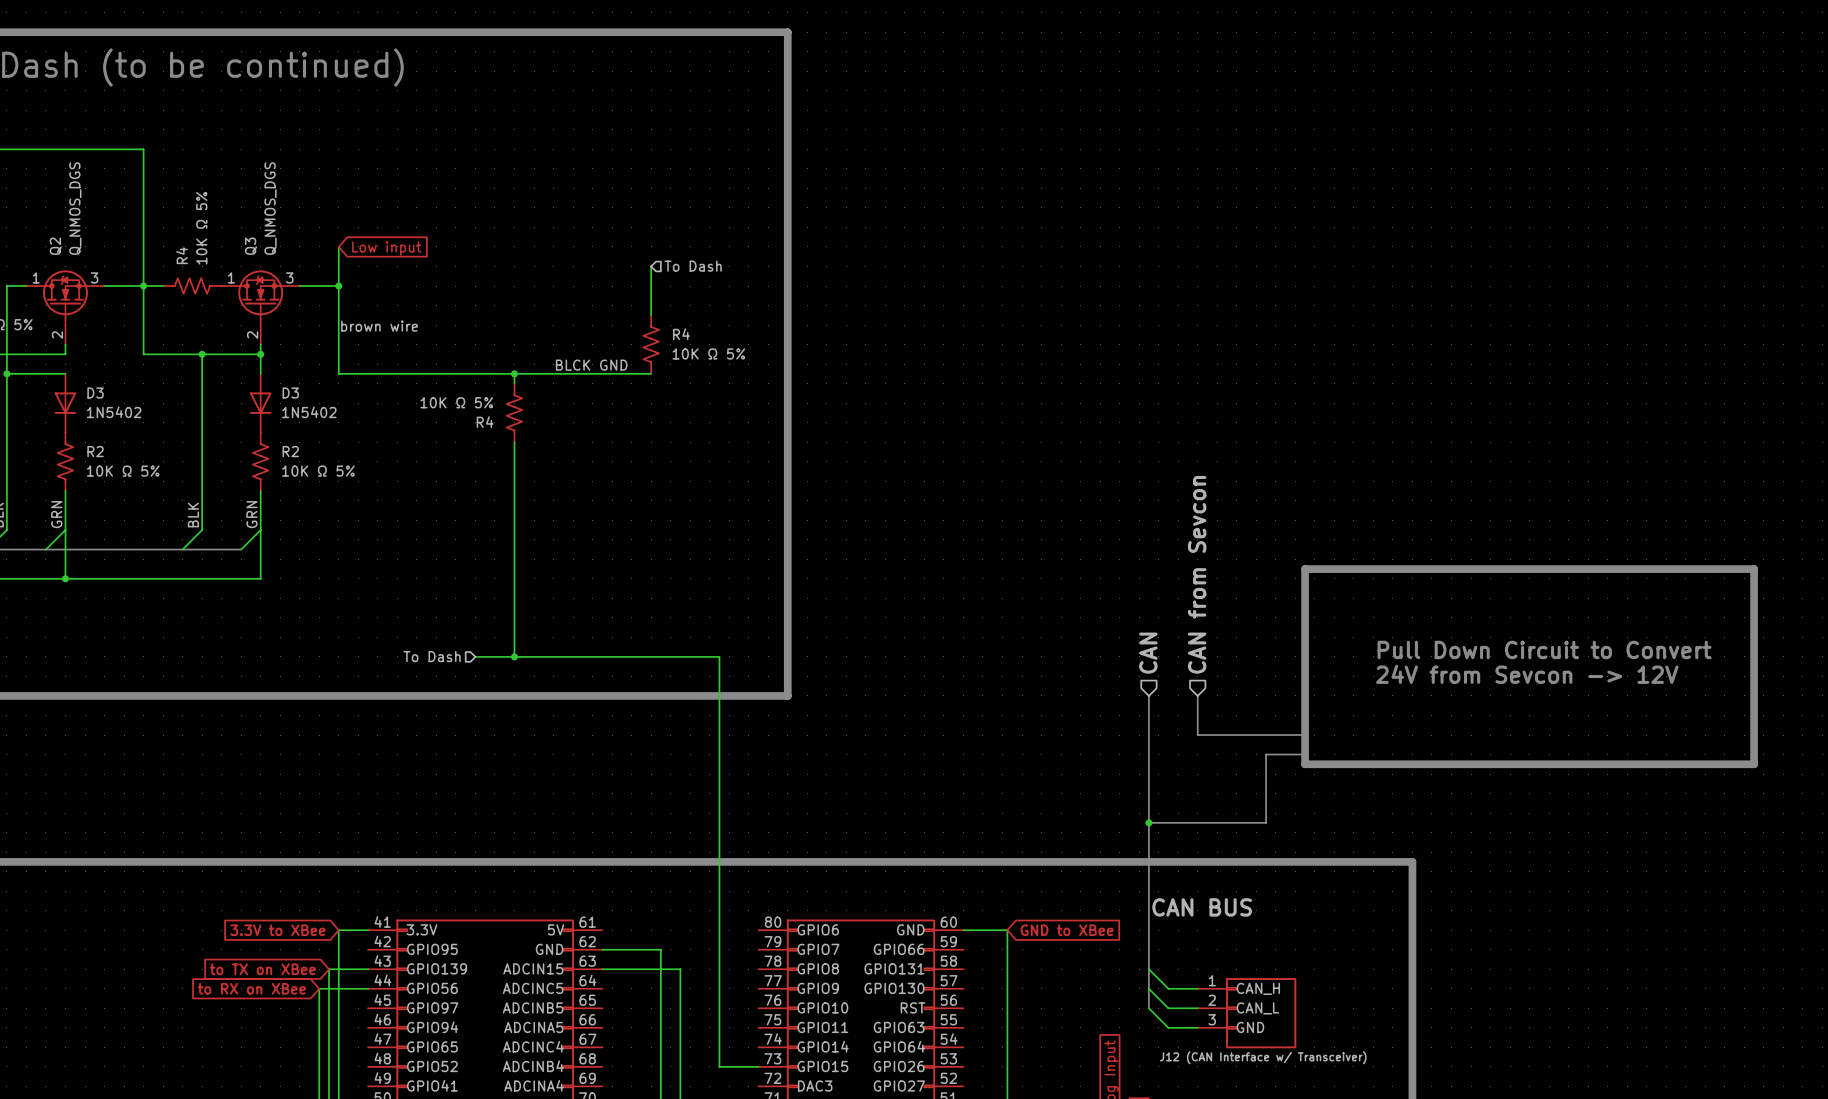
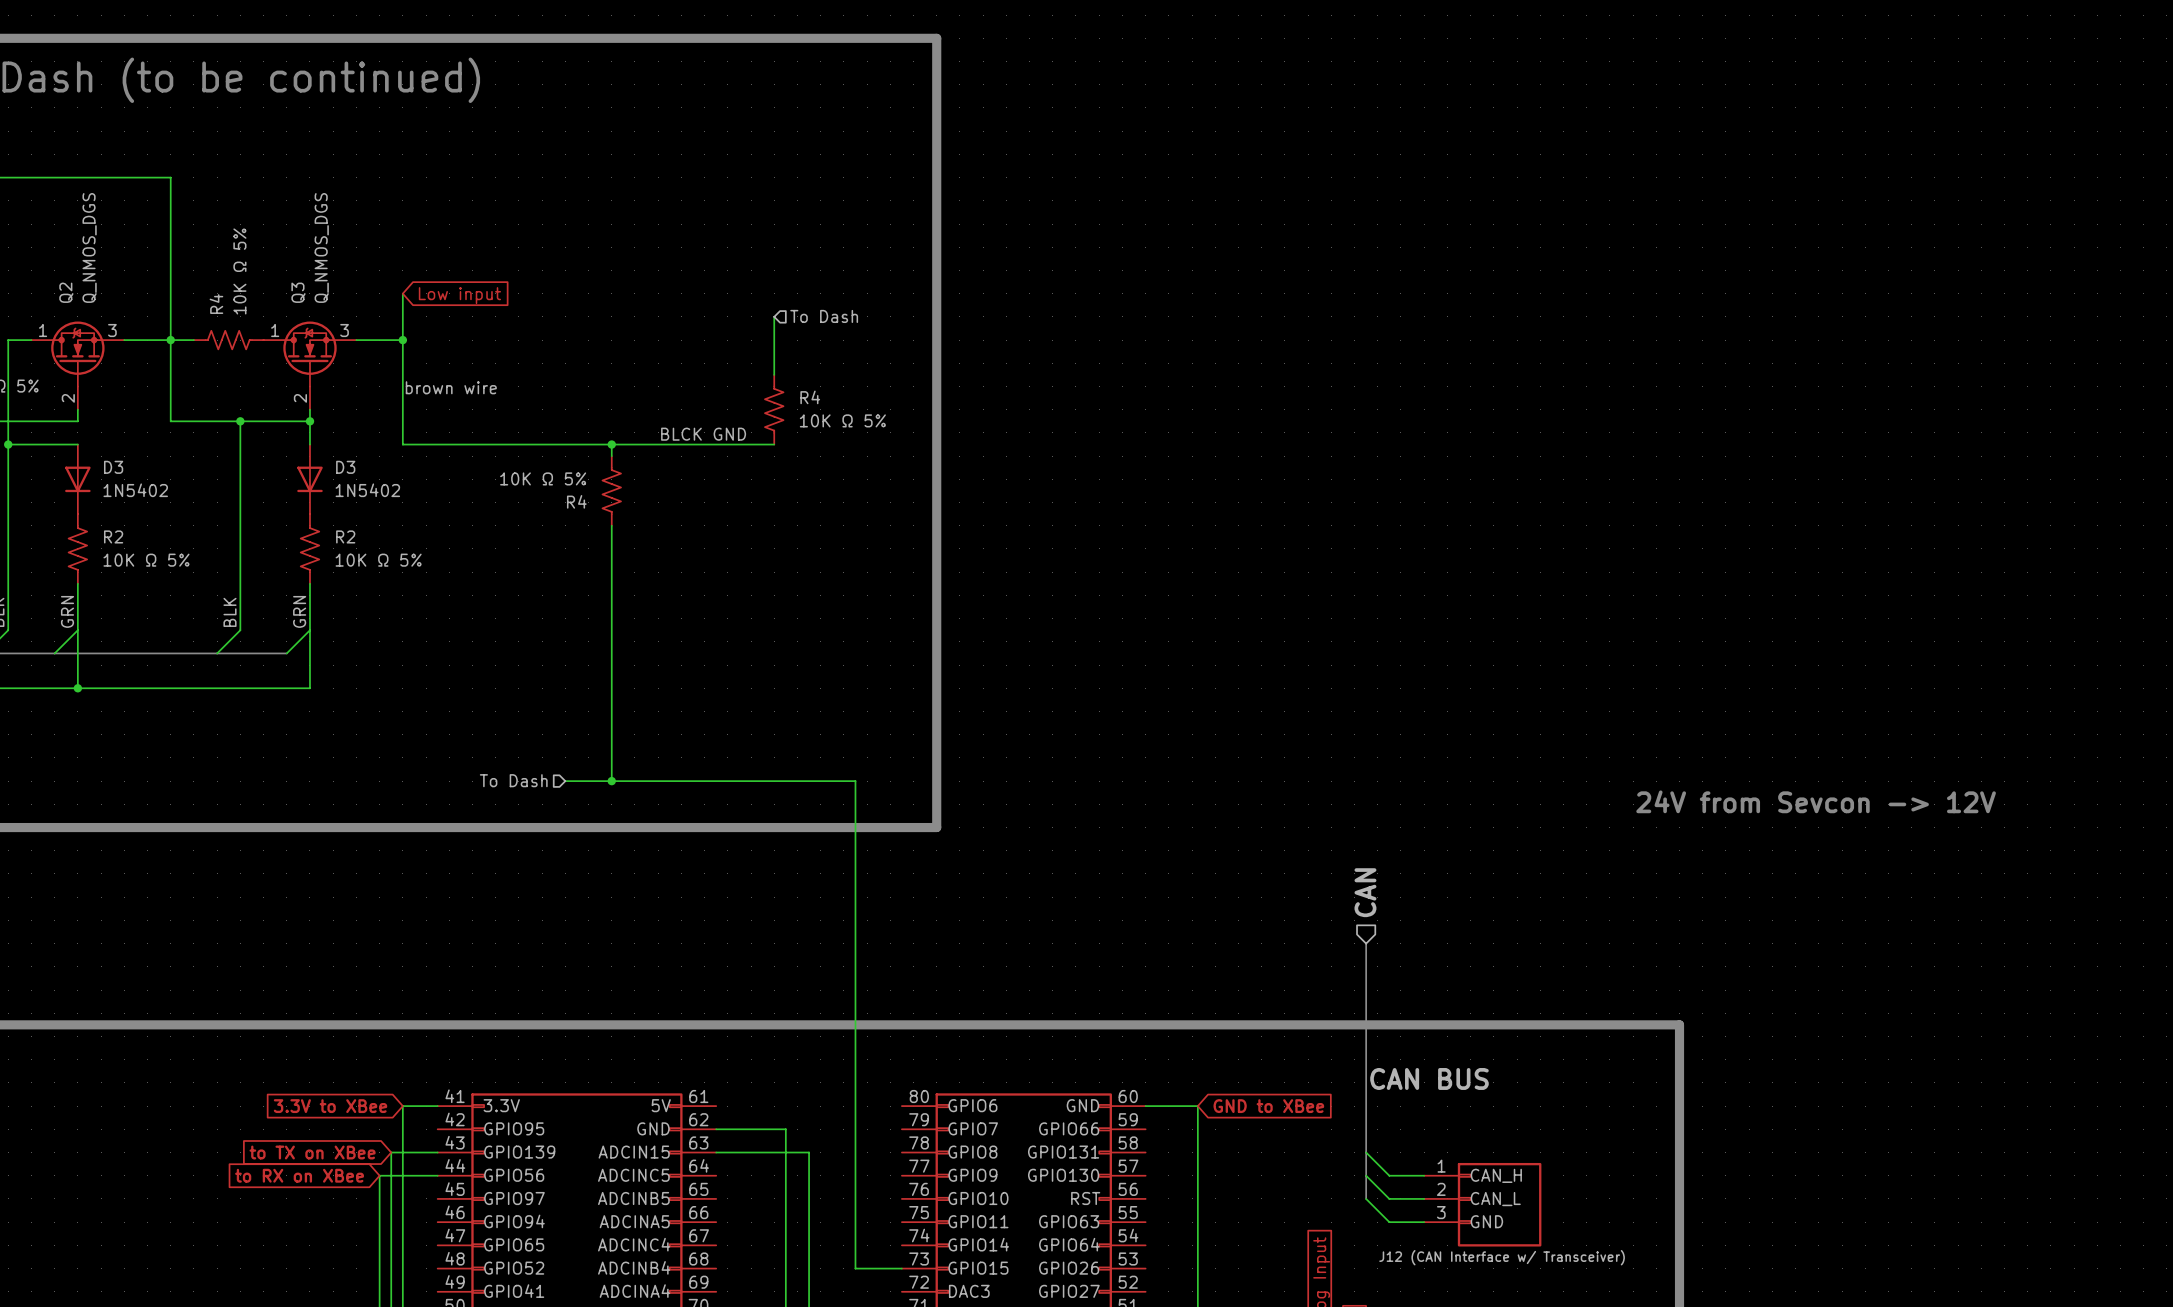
line: (1305, 569) (1754, 569) (1754, 764) (1305, 764) (1305, 569) -> none
hierarchical label: CAN from Sevcon (1197, 574) -> none
text: Pull Down Circuit to Convert (1544, 649) -> none
hierarchical label position: CAN (1148, 653) -> CAN (1365, 892)
bus: (1148, 695) (1148, 793) -> none
bus: (1197, 695) (1197, 735) (1305, 735) -> none
bus: (1305, 754) (1266, 754) (1266, 822) (1148, 822) -> none
junction: (1148, 822) -> none

